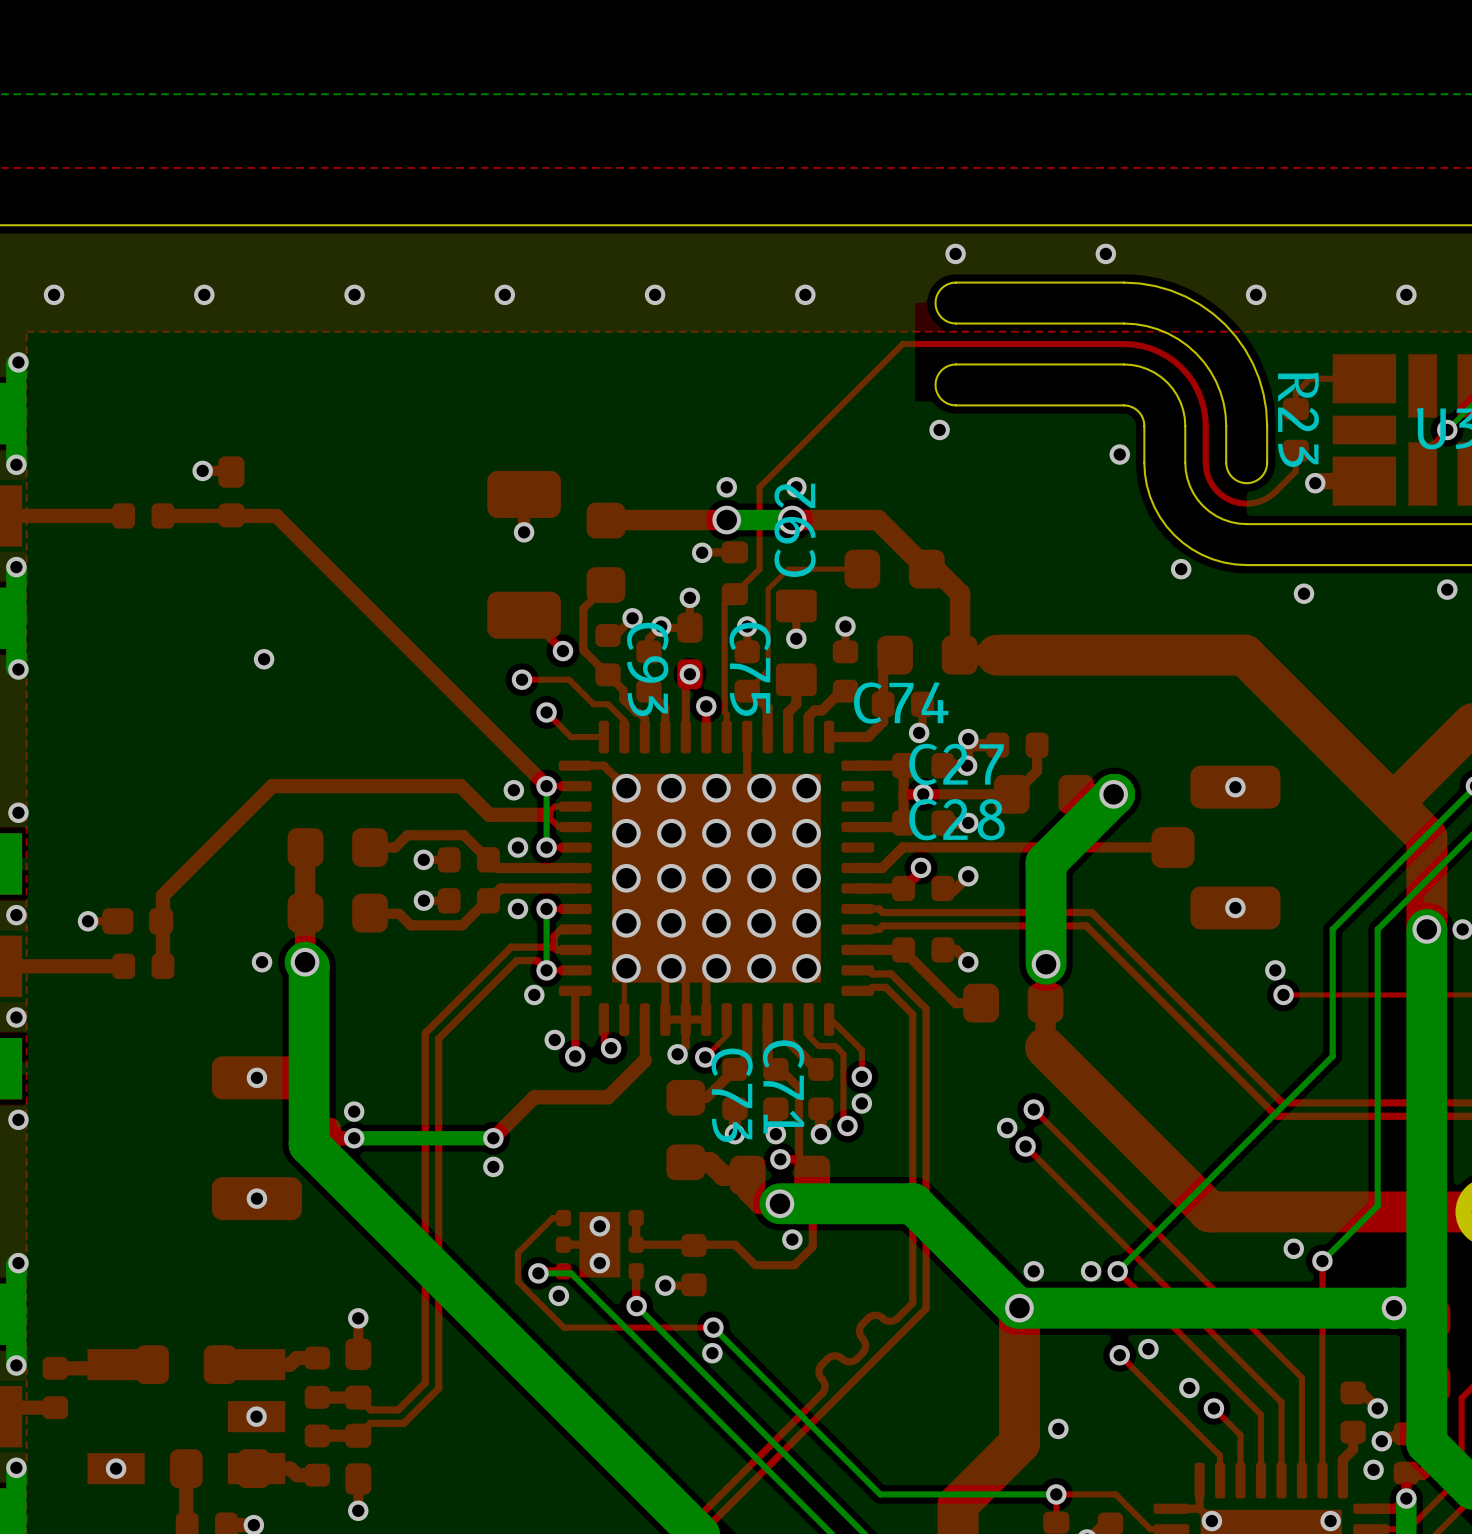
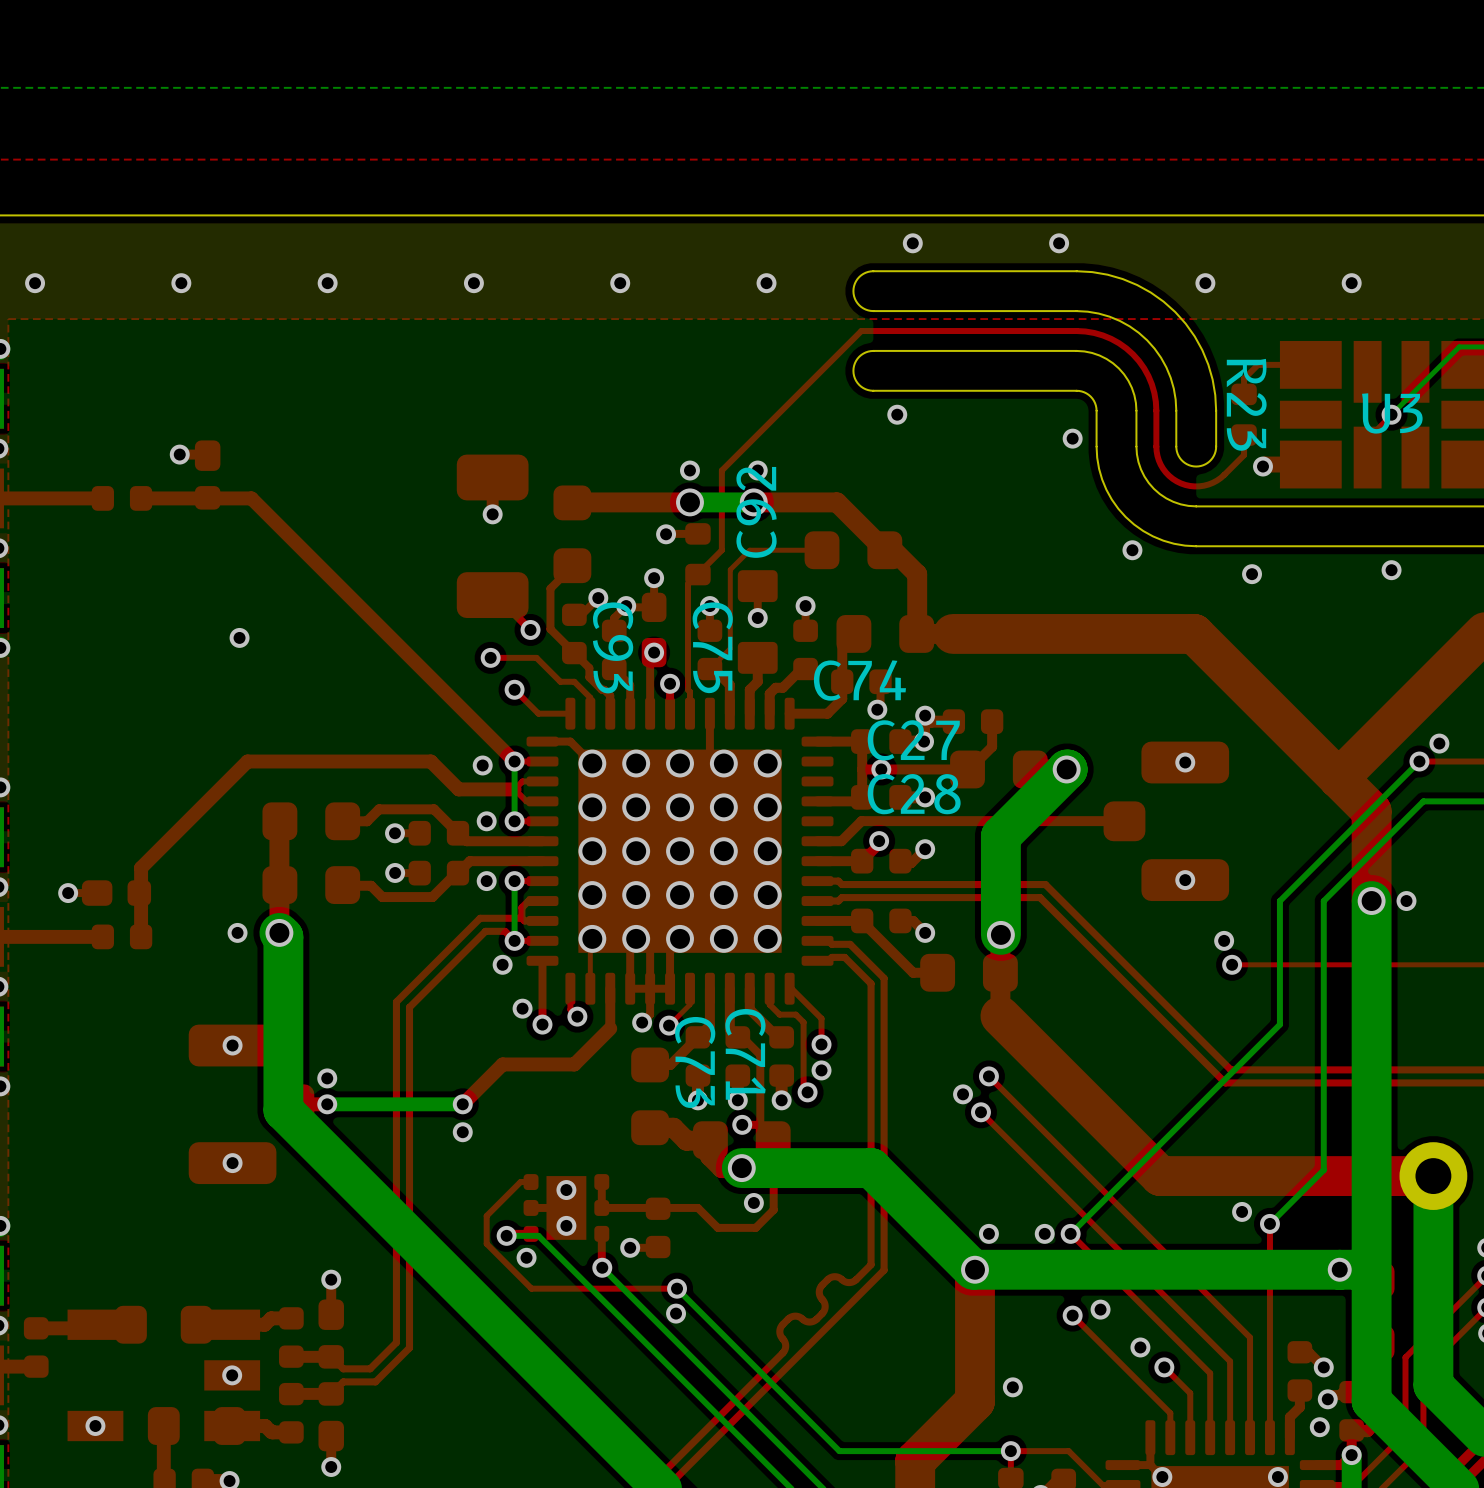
board edge: (956, 282) (948, 283) (940, 289) (935, 303) (940, 316) (946, 321) (956, 323) -> (913, 271) (868, 271) (857, 279) (853, 291) (857, 303) (868, 310) (913, 311)
board edge: (956, 364) (948, 365) (940, 371) (935, 384) (940, 398) (946, 403) (956, 405) -> (913, 350) (868, 351) (857, 358) (853, 370) (857, 383) (868, 390) (913, 390)

